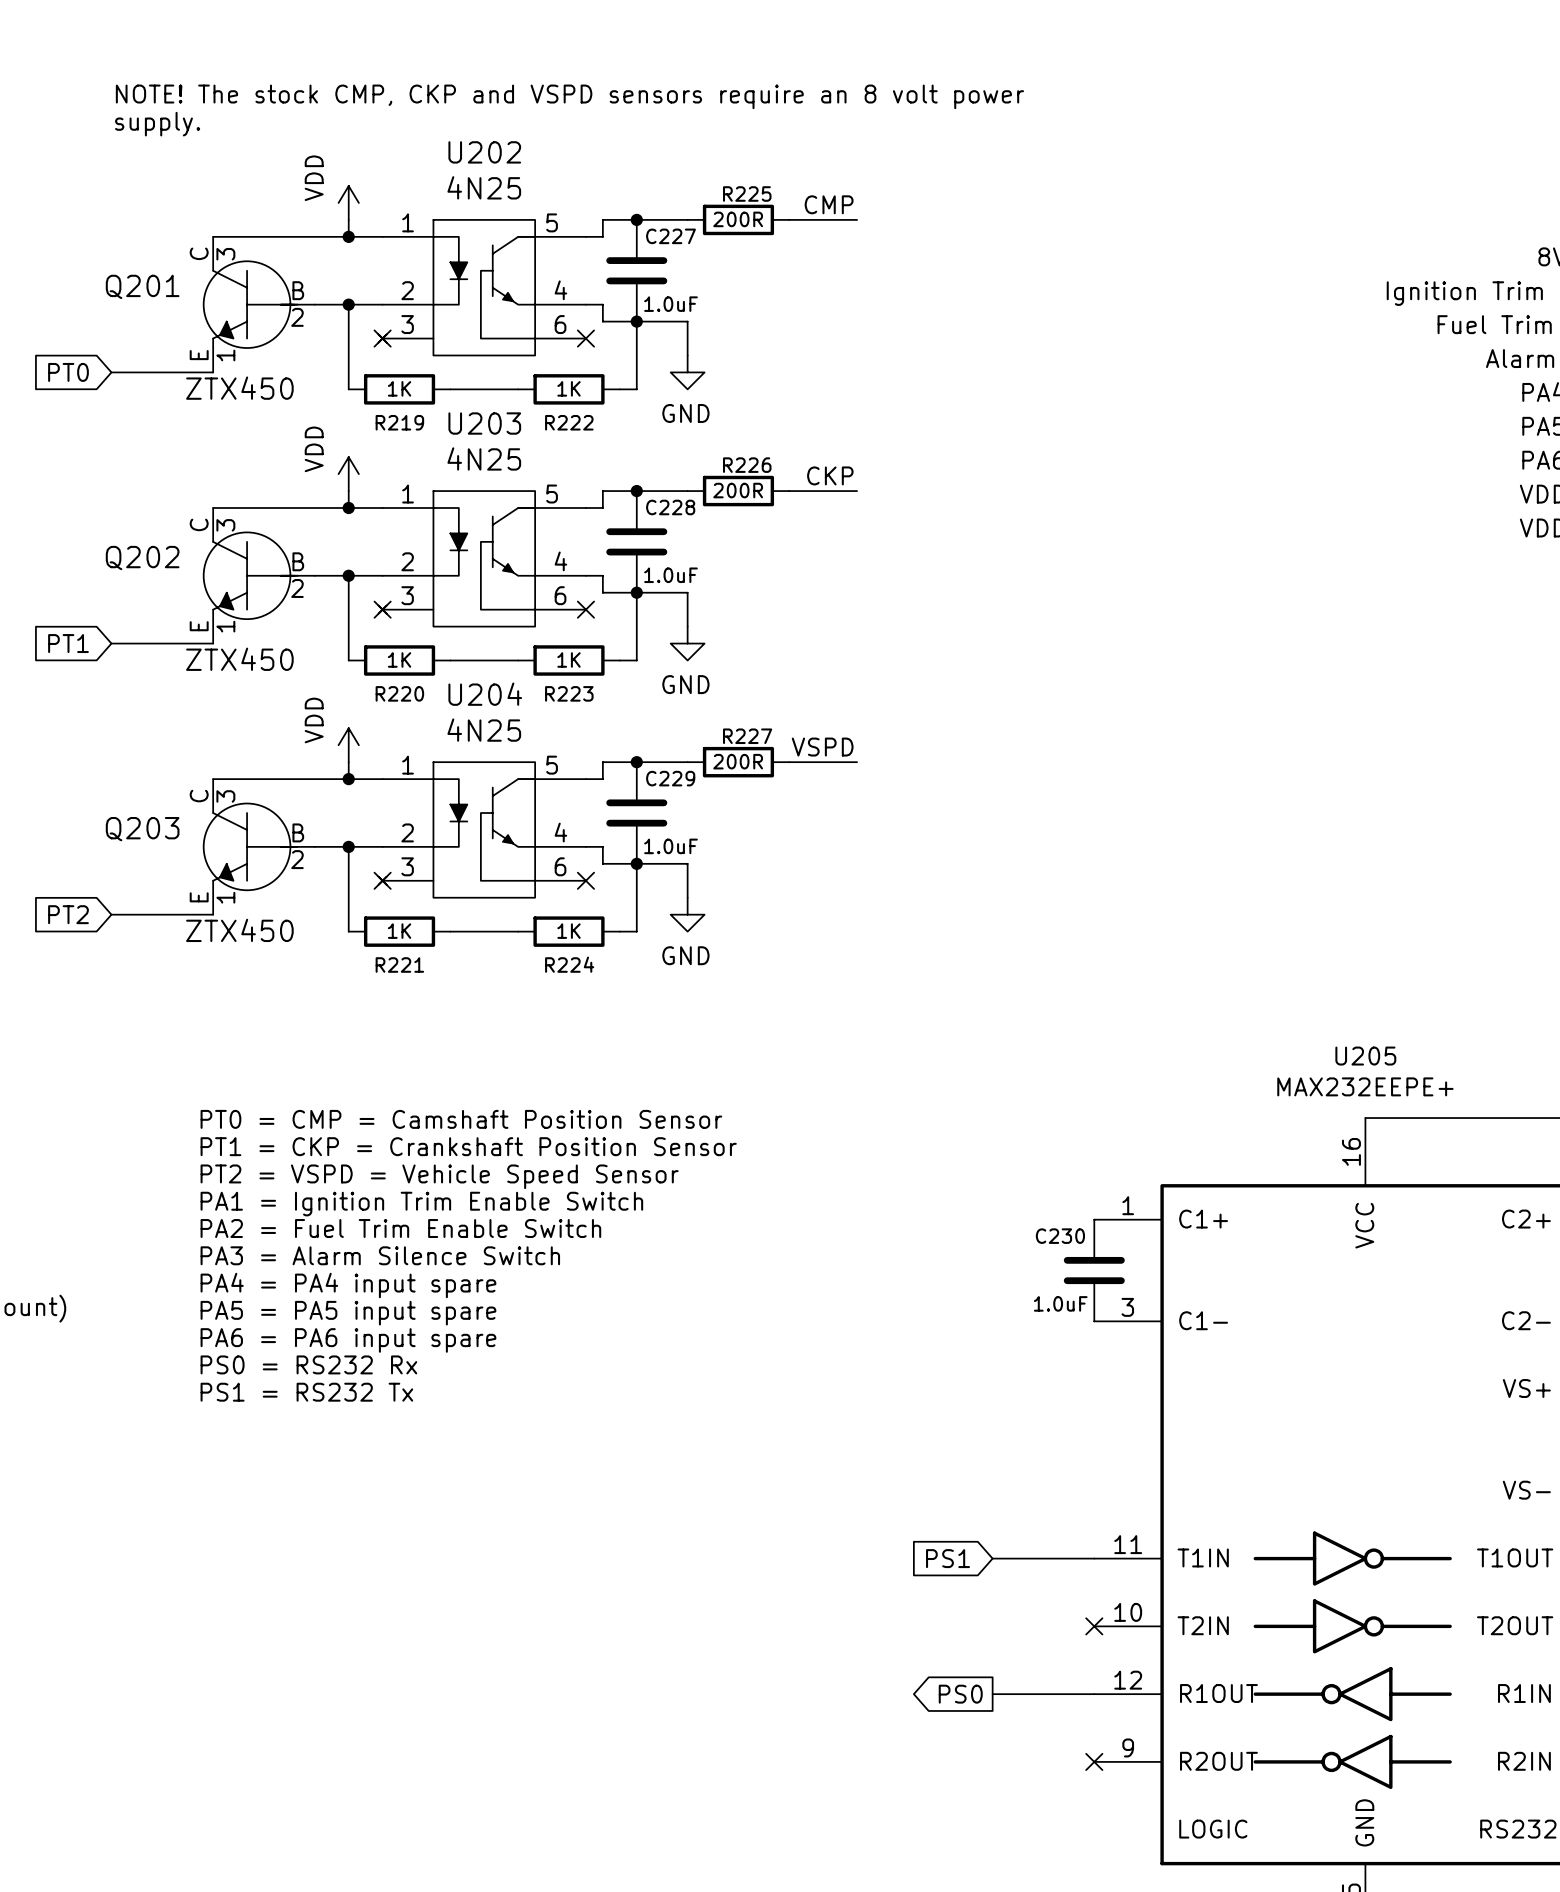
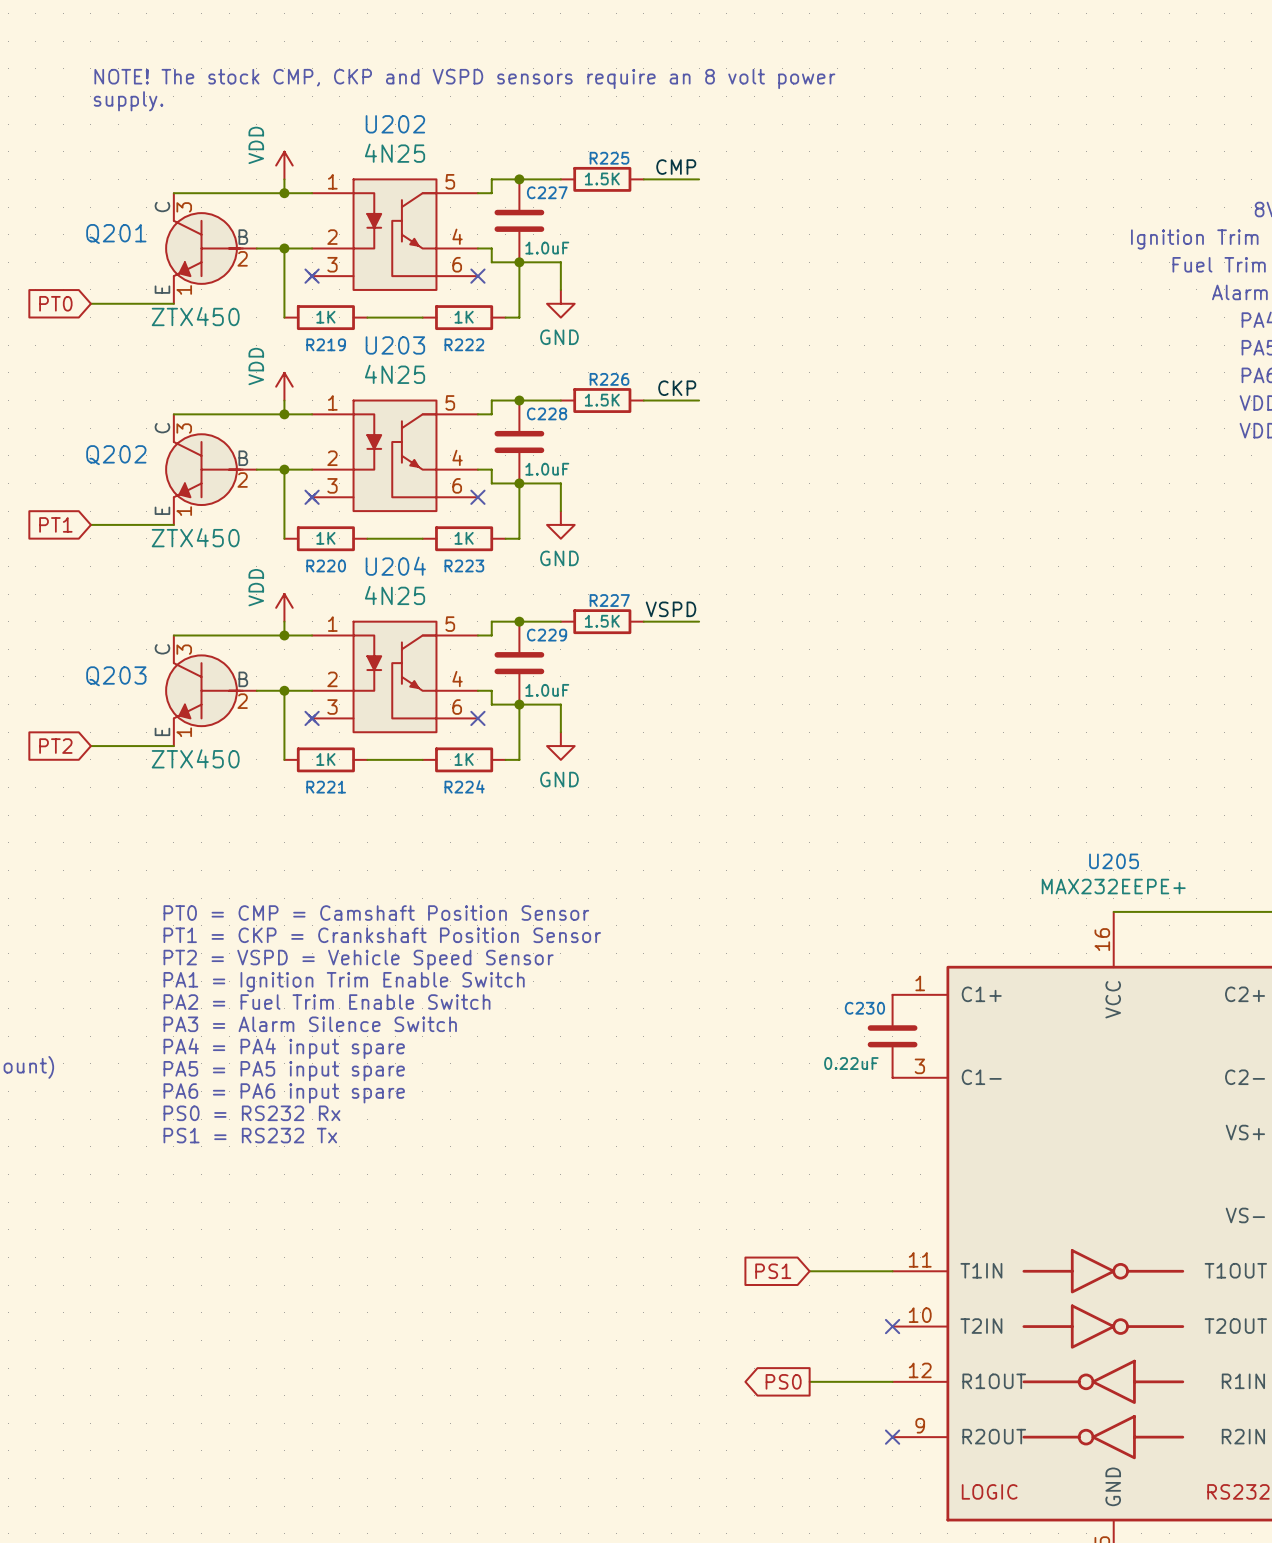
R225 value: 200R (738, 219) -> 1.5K (602, 178)
R226 value: 200R (738, 490) -> 1.5K (602, 400)
R227 value: 200R (738, 761) -> 1.5K (602, 621)
C230 value: 1.0uF (1060, 1303) -> 0.22uF (851, 1063)

